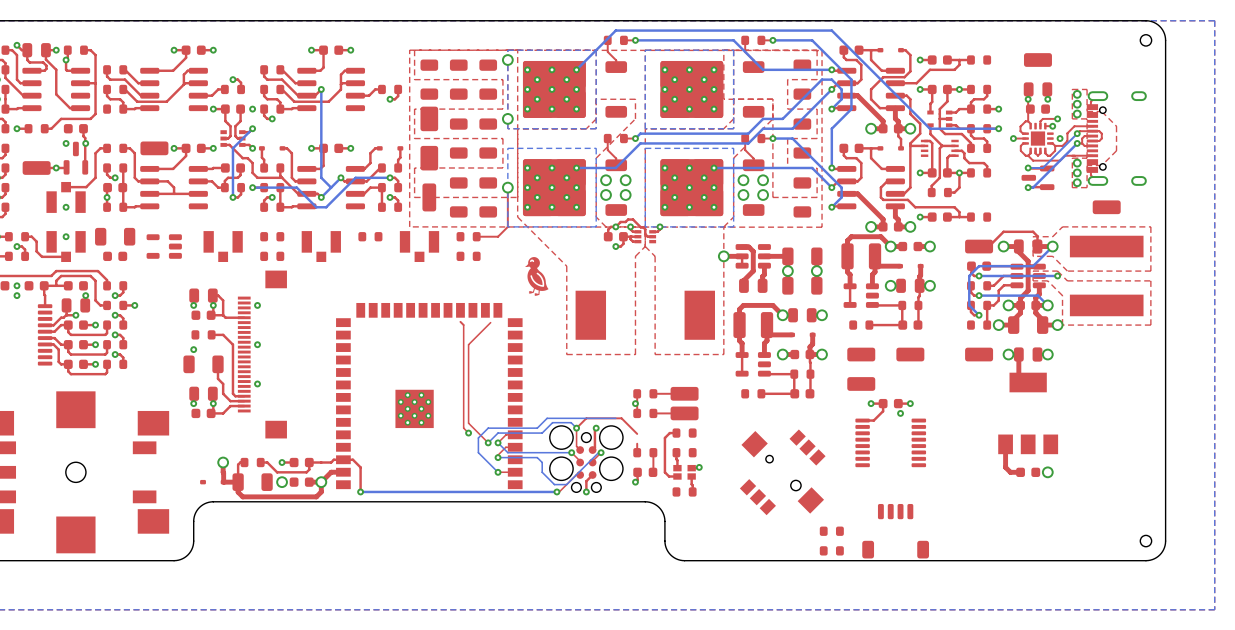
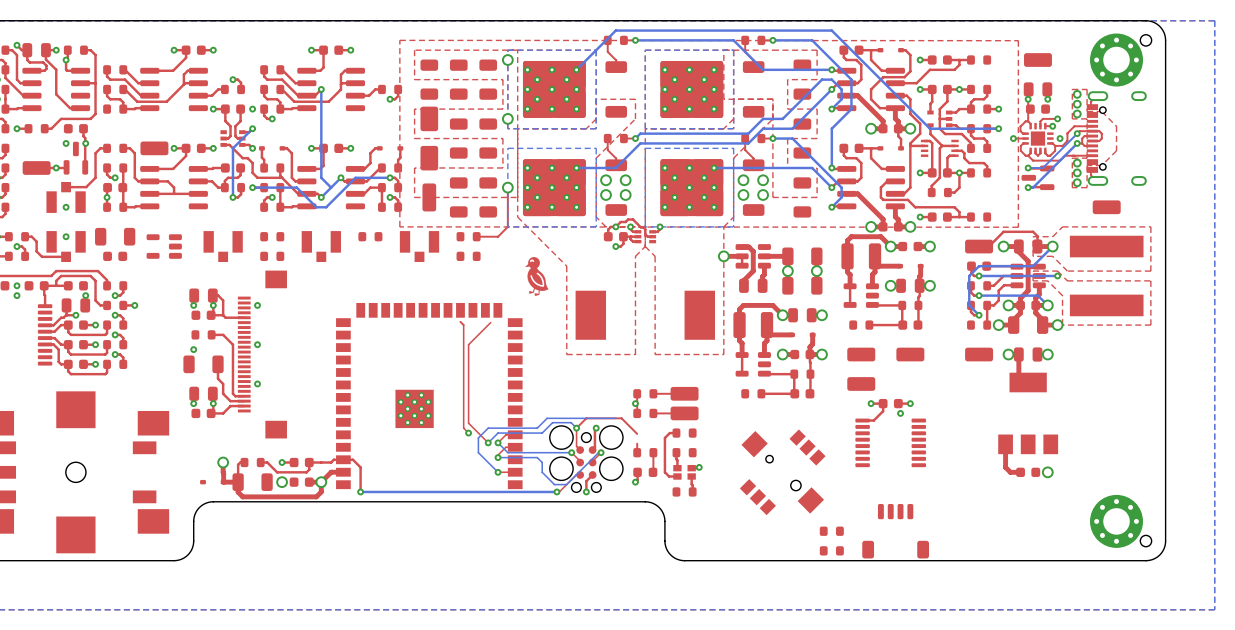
top zone outline: (409, 50) (409, 226) (822, 227) (822, 50) (409, 50) -> (399, 40) (1018, 40) (1018, 227) (399, 226) (399, 40)
part: none -> (1116, 60)
part: none -> (1116, 521)

